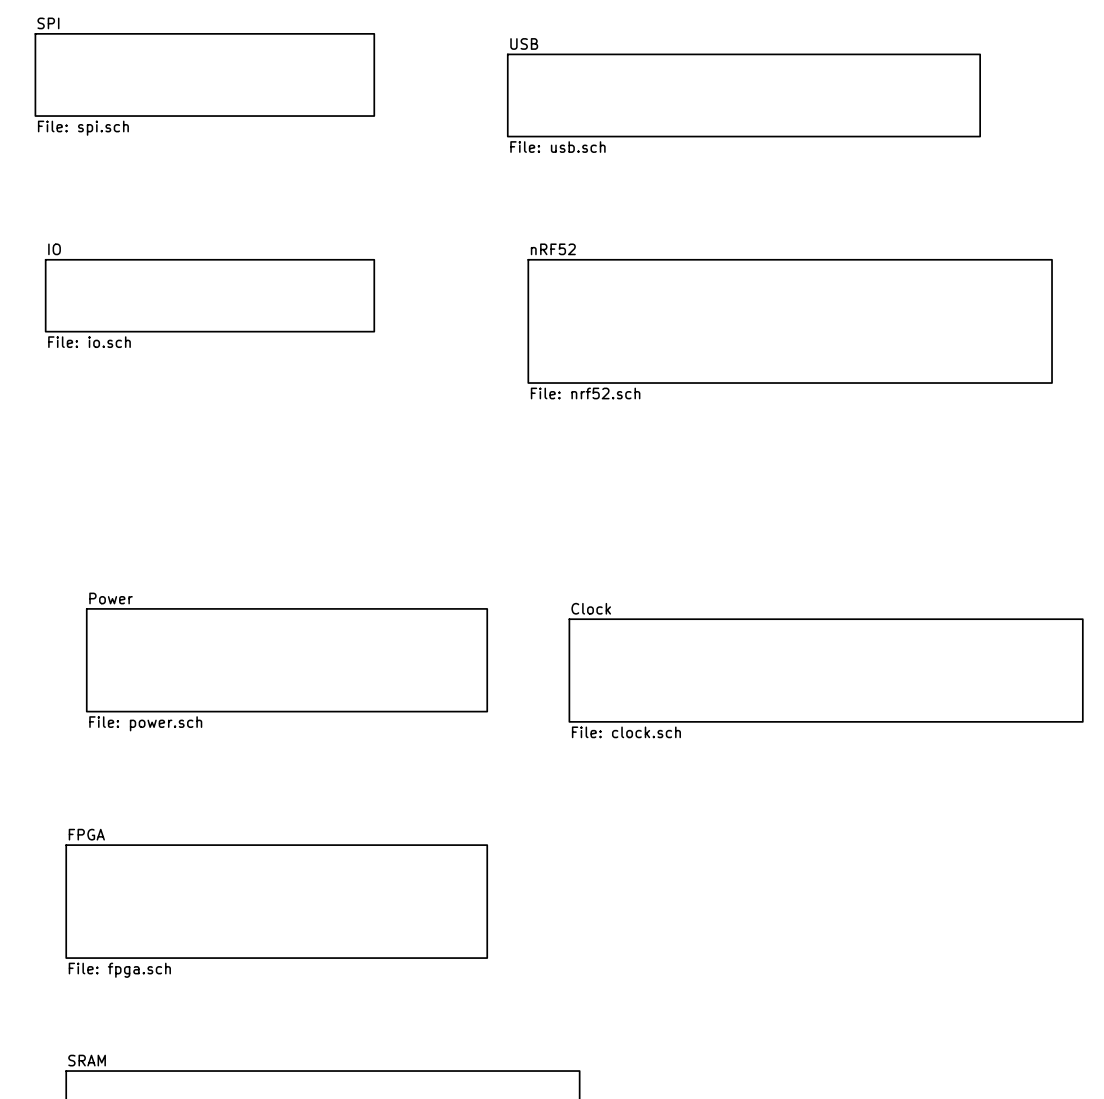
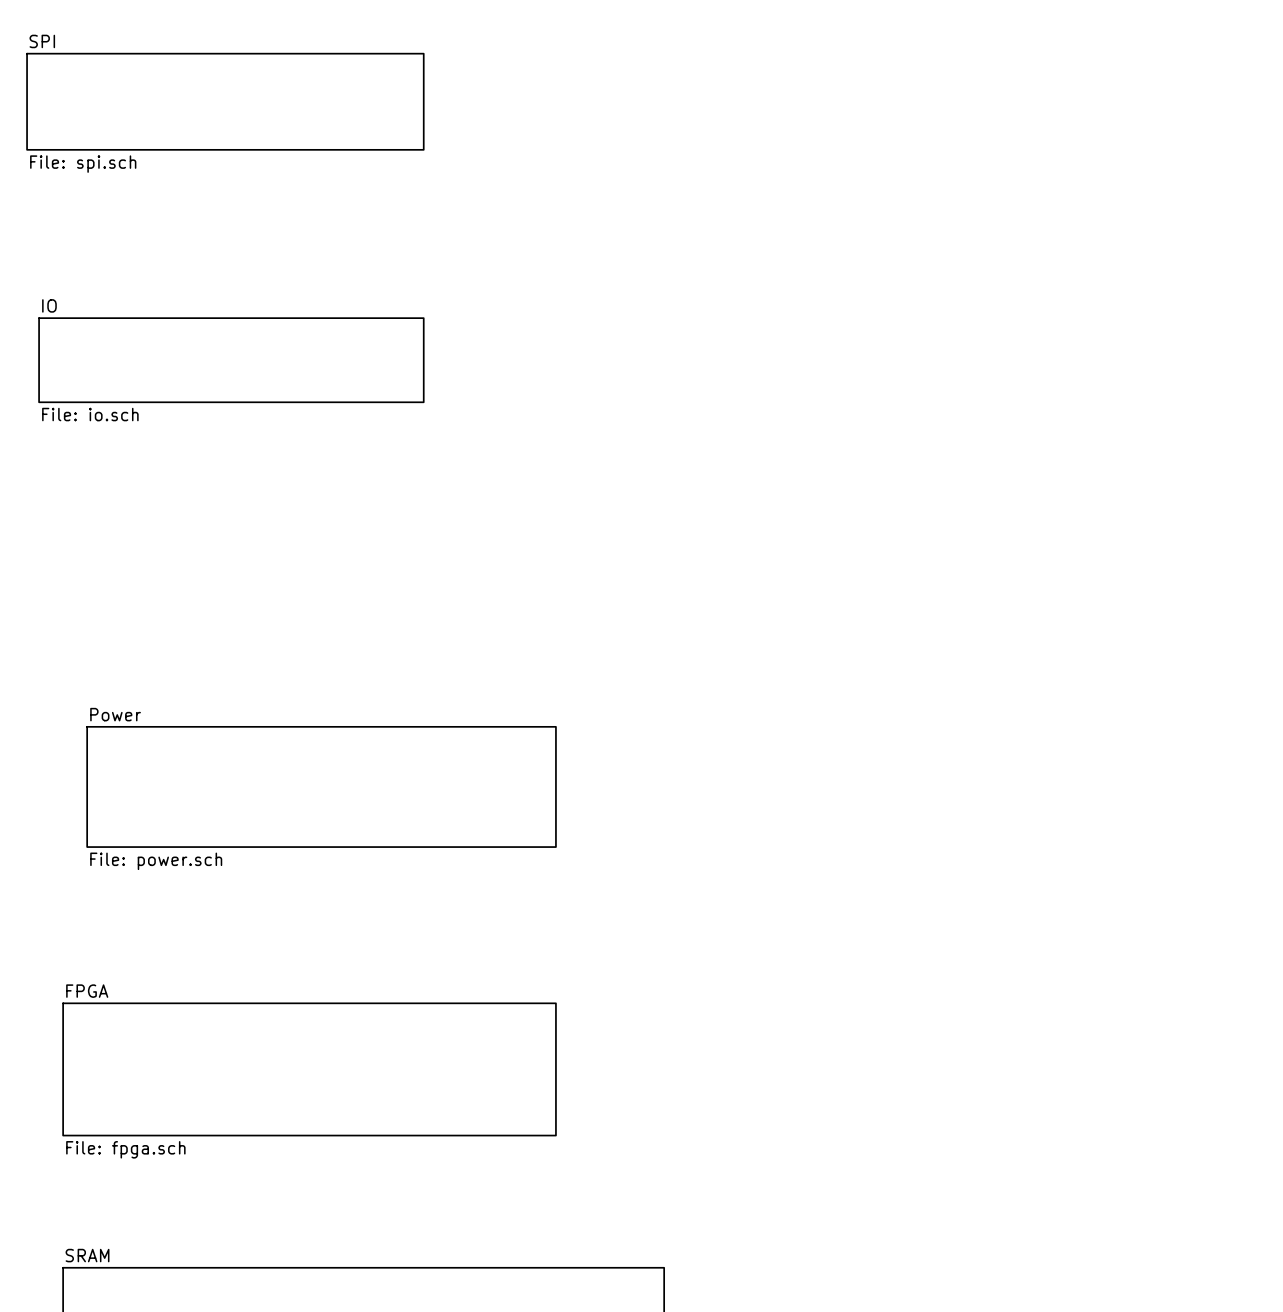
sheet USB: File: usb.sch (743, 95) -> none
sheet nRF52: File: nrf52.sch (790, 321) -> none
sheet Clock: File: clock.sch (826, 670) -> none

